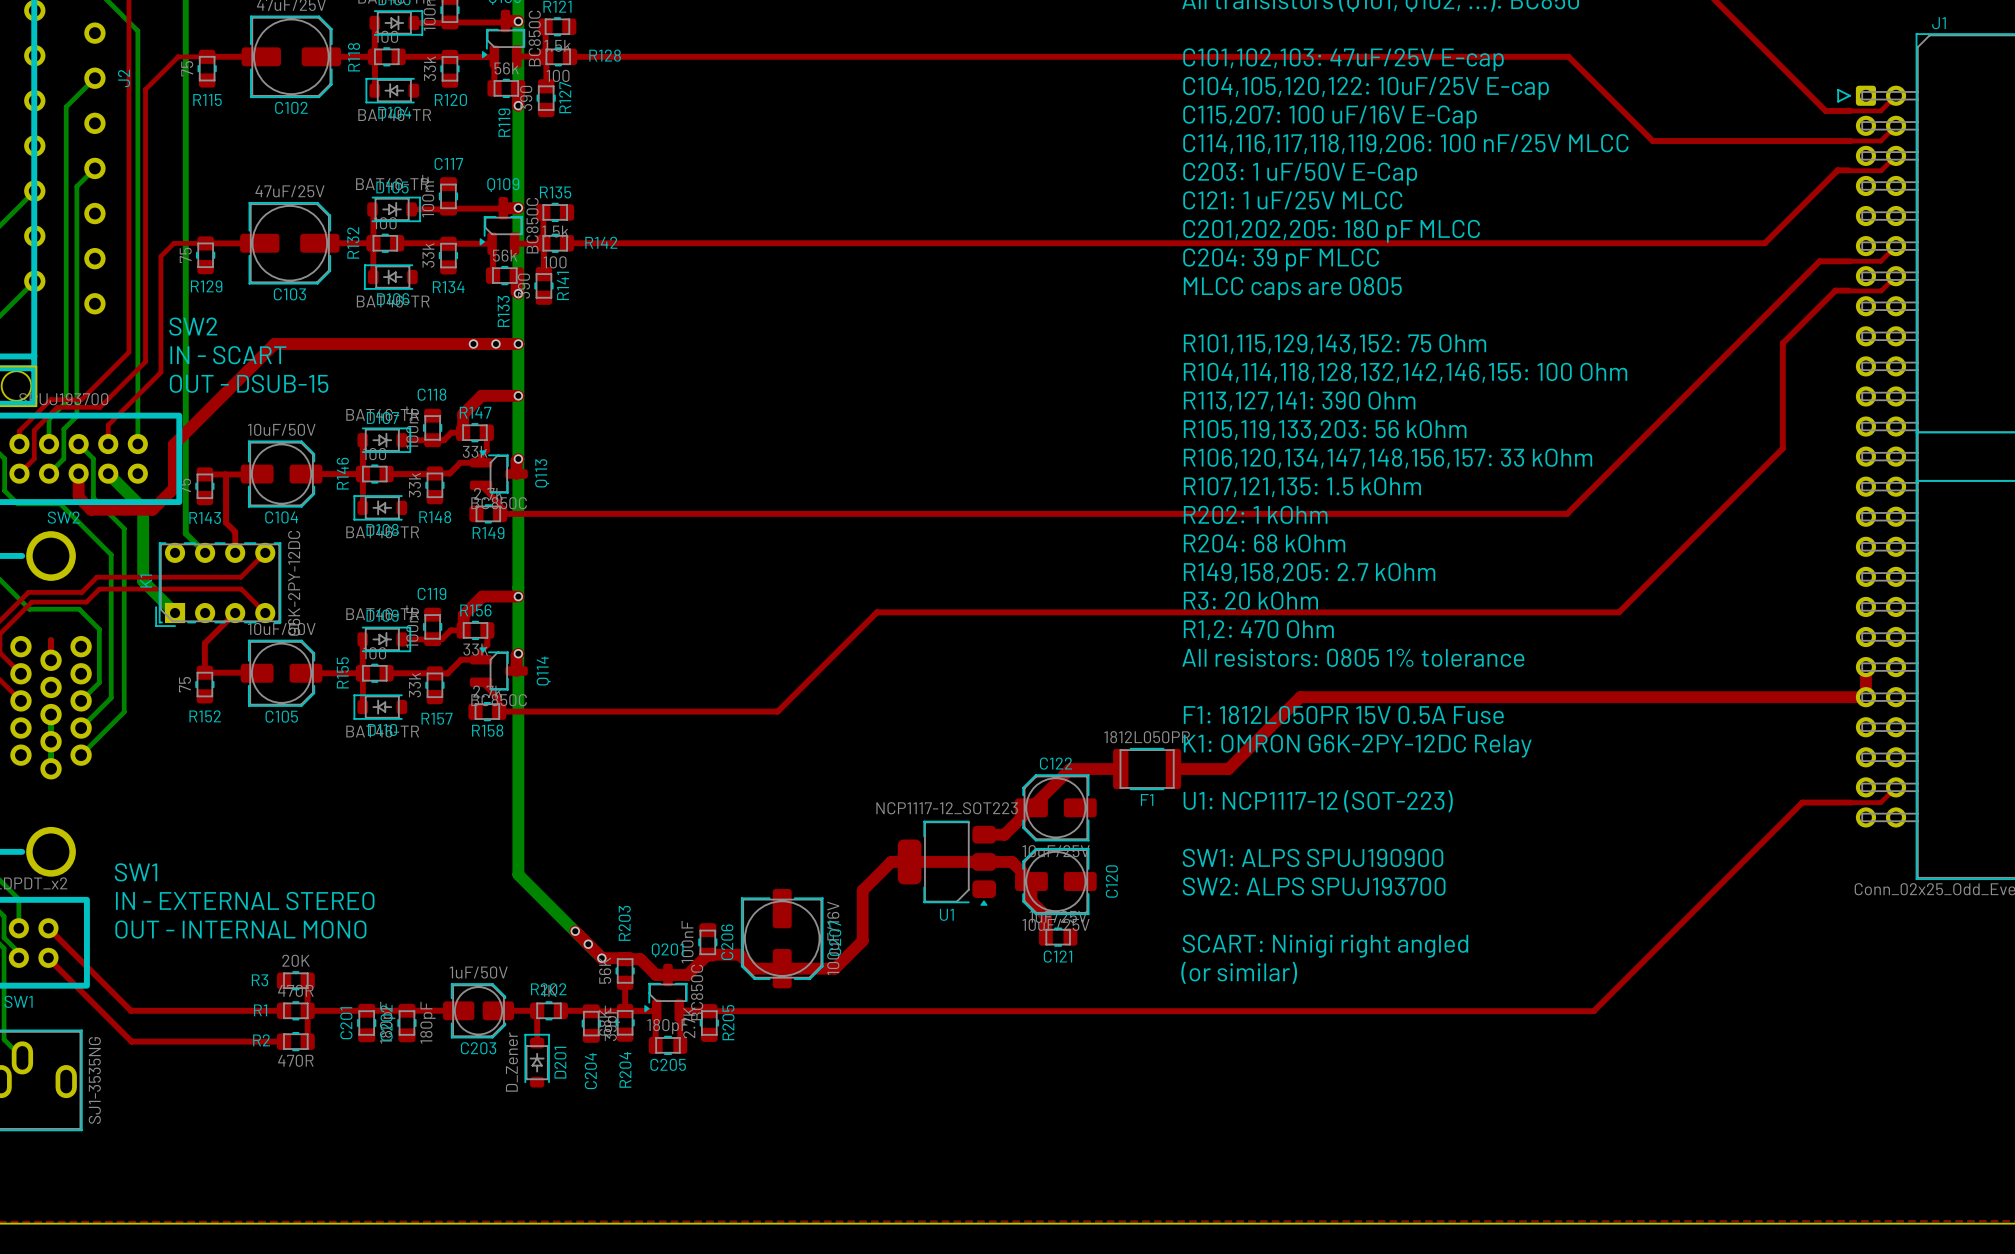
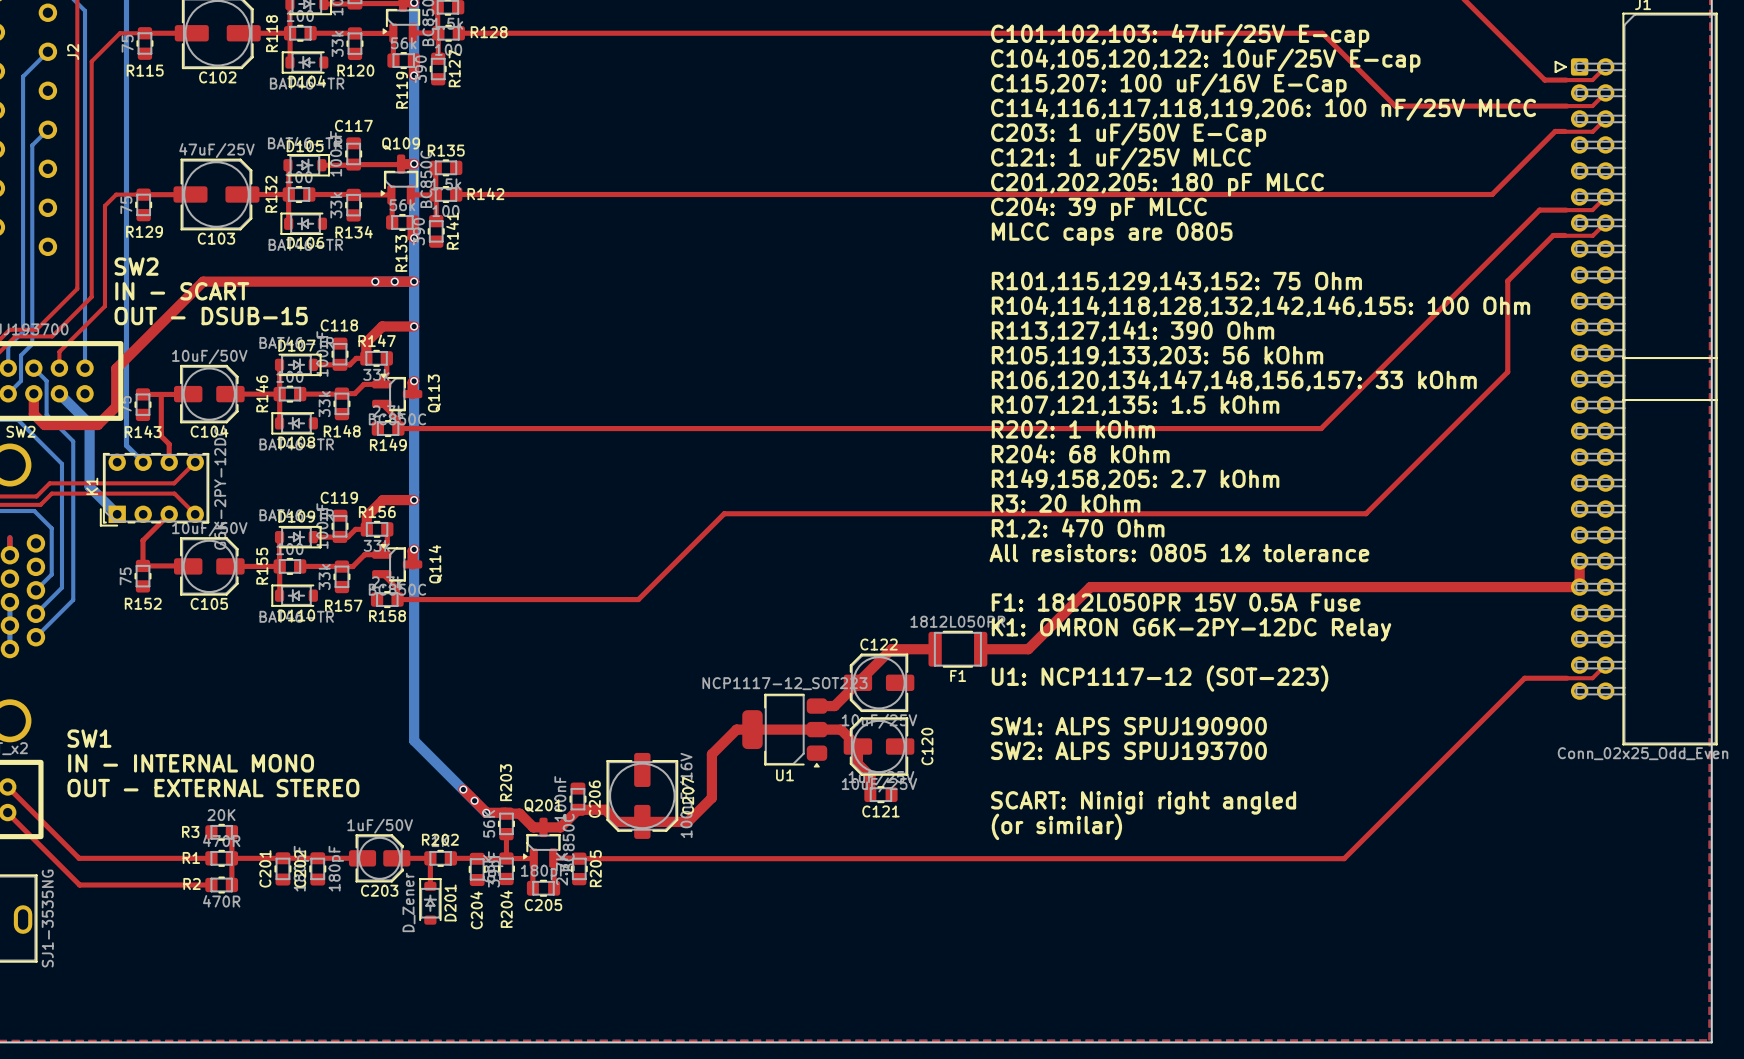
text: IN - EXTERNAL STEREO (245, 900) -> IN - INTERNAL MONO (191, 763)
text: OUT - INTERNAL MONO (240, 929) -> OUT - EXTERNAL STEREO (213, 788)

